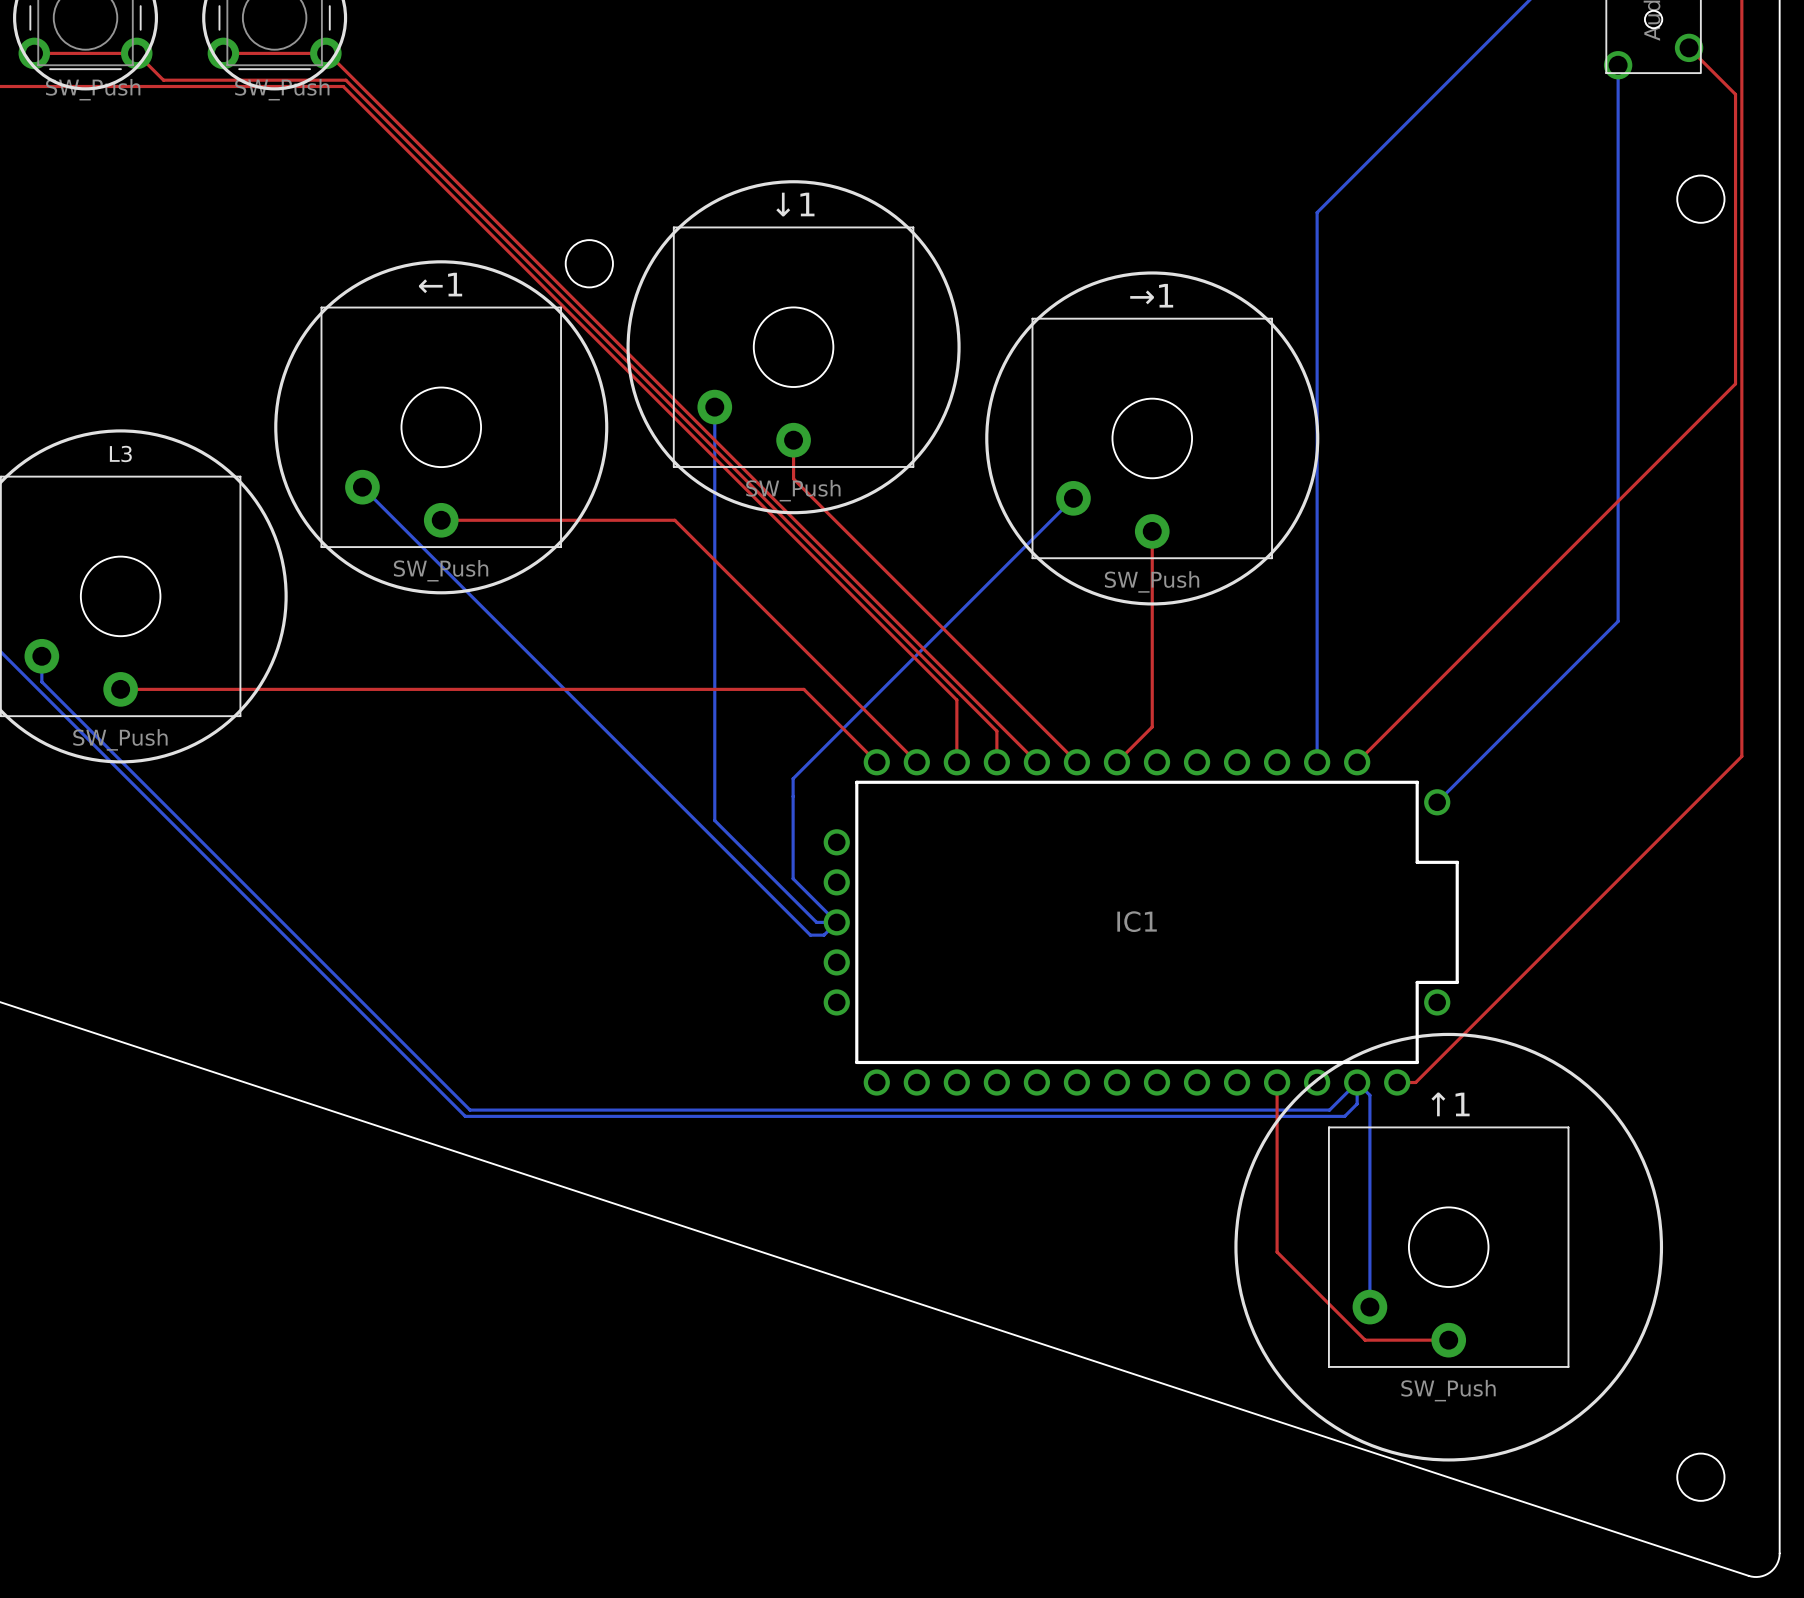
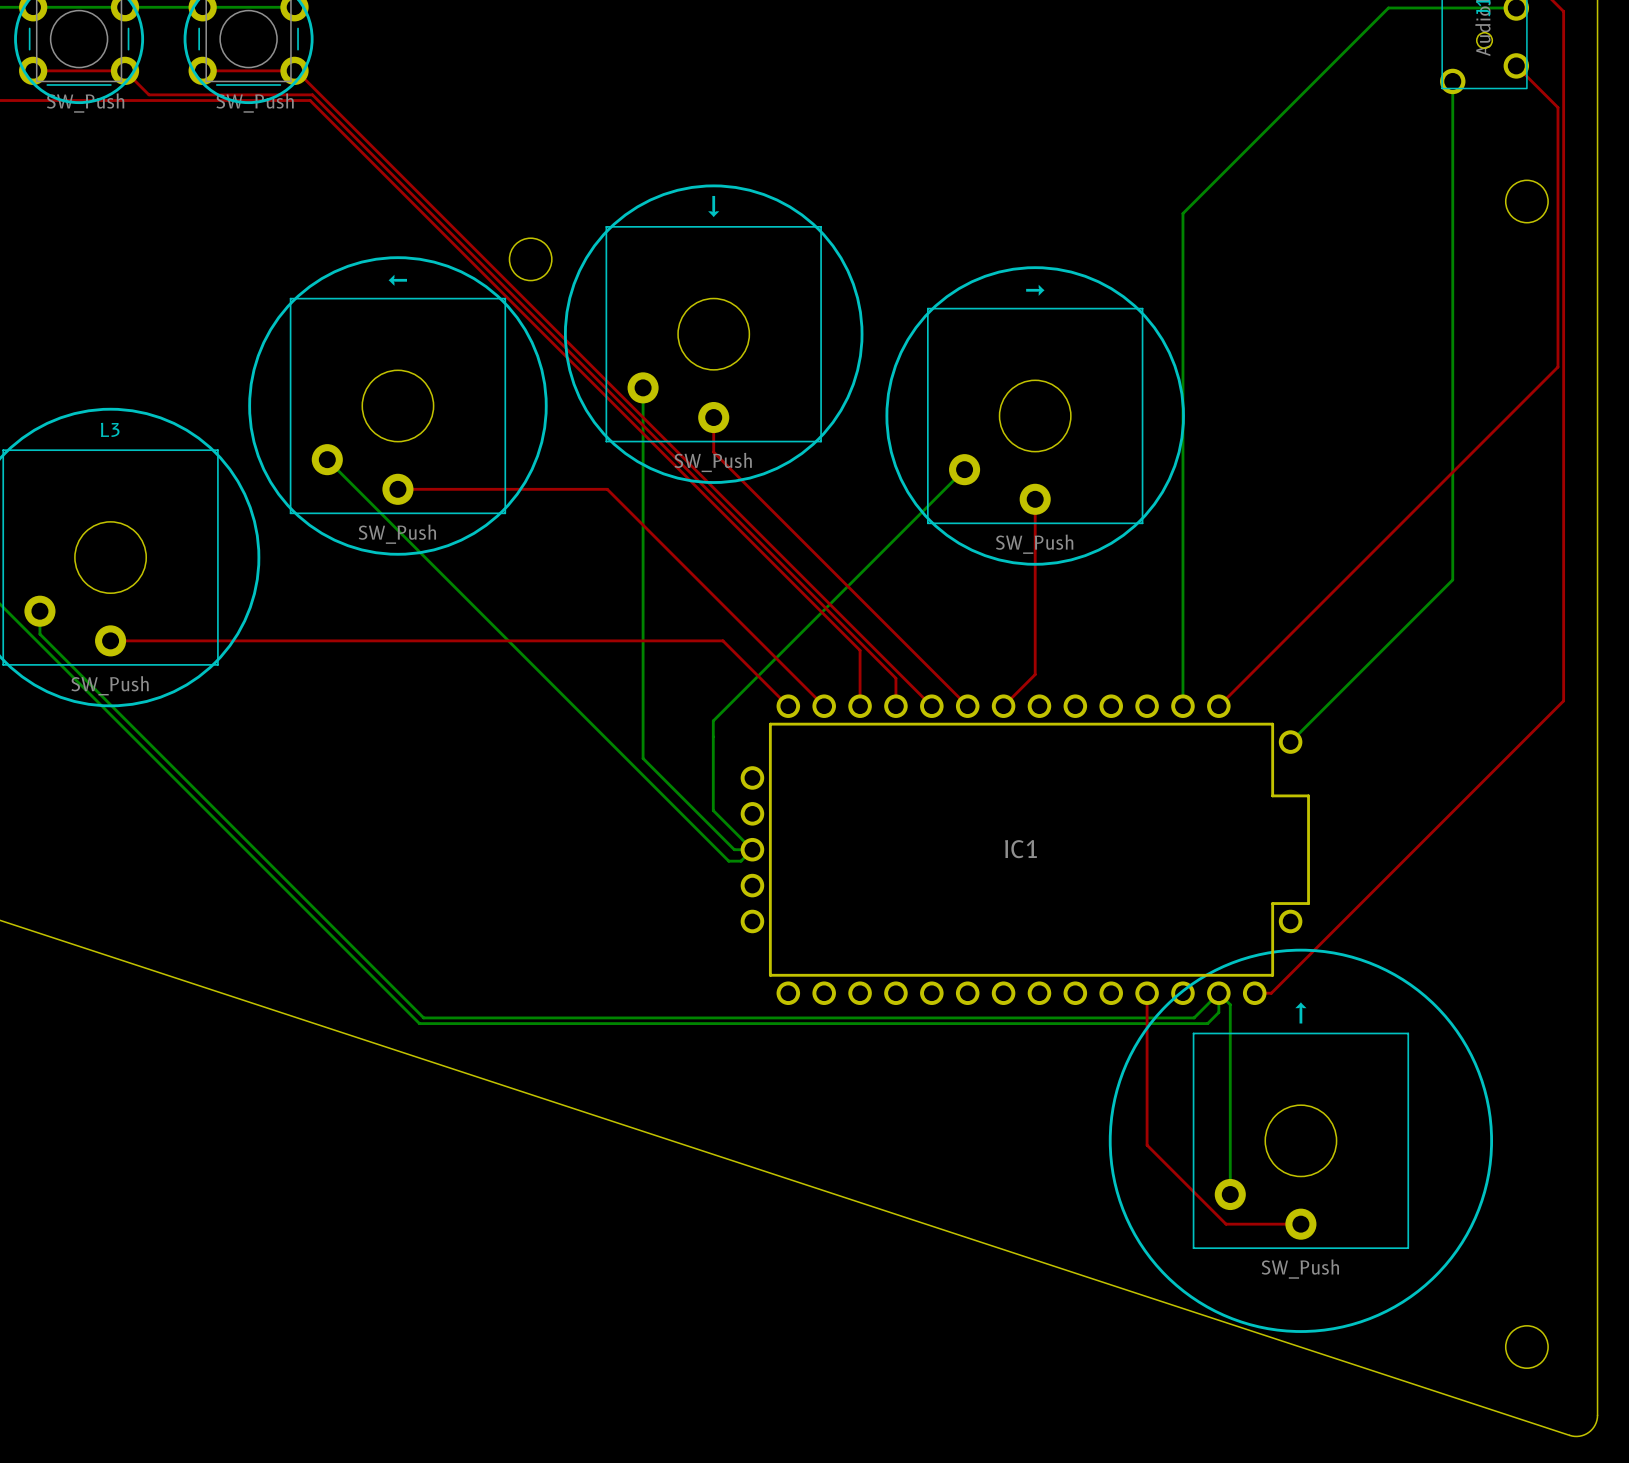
↓1 name: ↓1 (795, 204) -> ↓ (713, 206)
←1 name: ←1 (440, 284) -> ← (397, 280)
→1 name: →1 (1151, 295) -> → (1035, 290)
↑1 name: ↑1 (1450, 1104) -> ↑ (1300, 1012)

